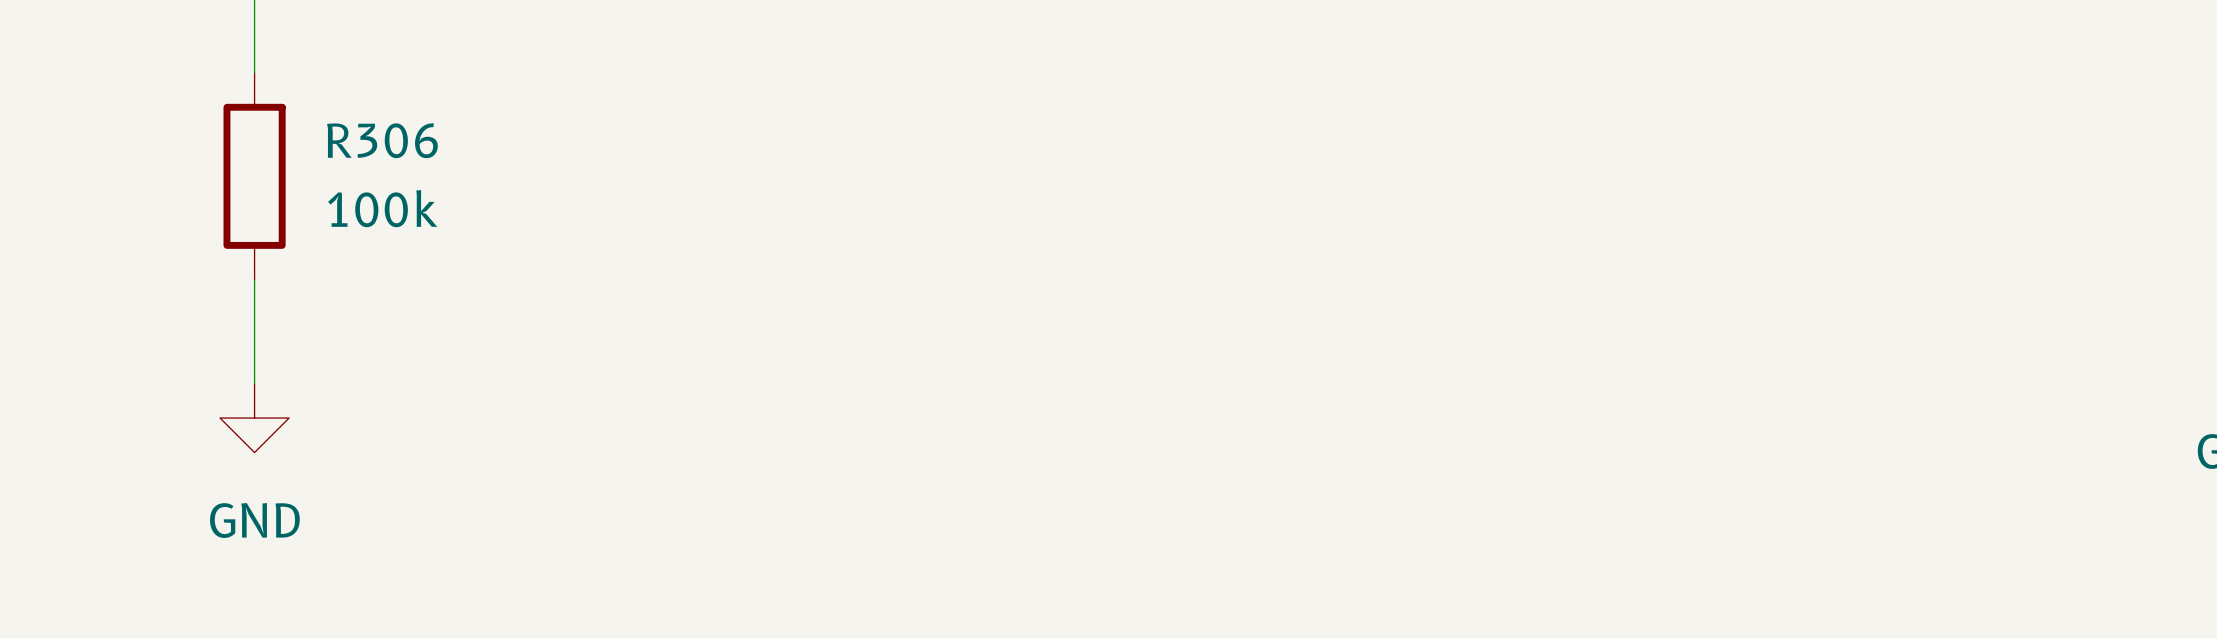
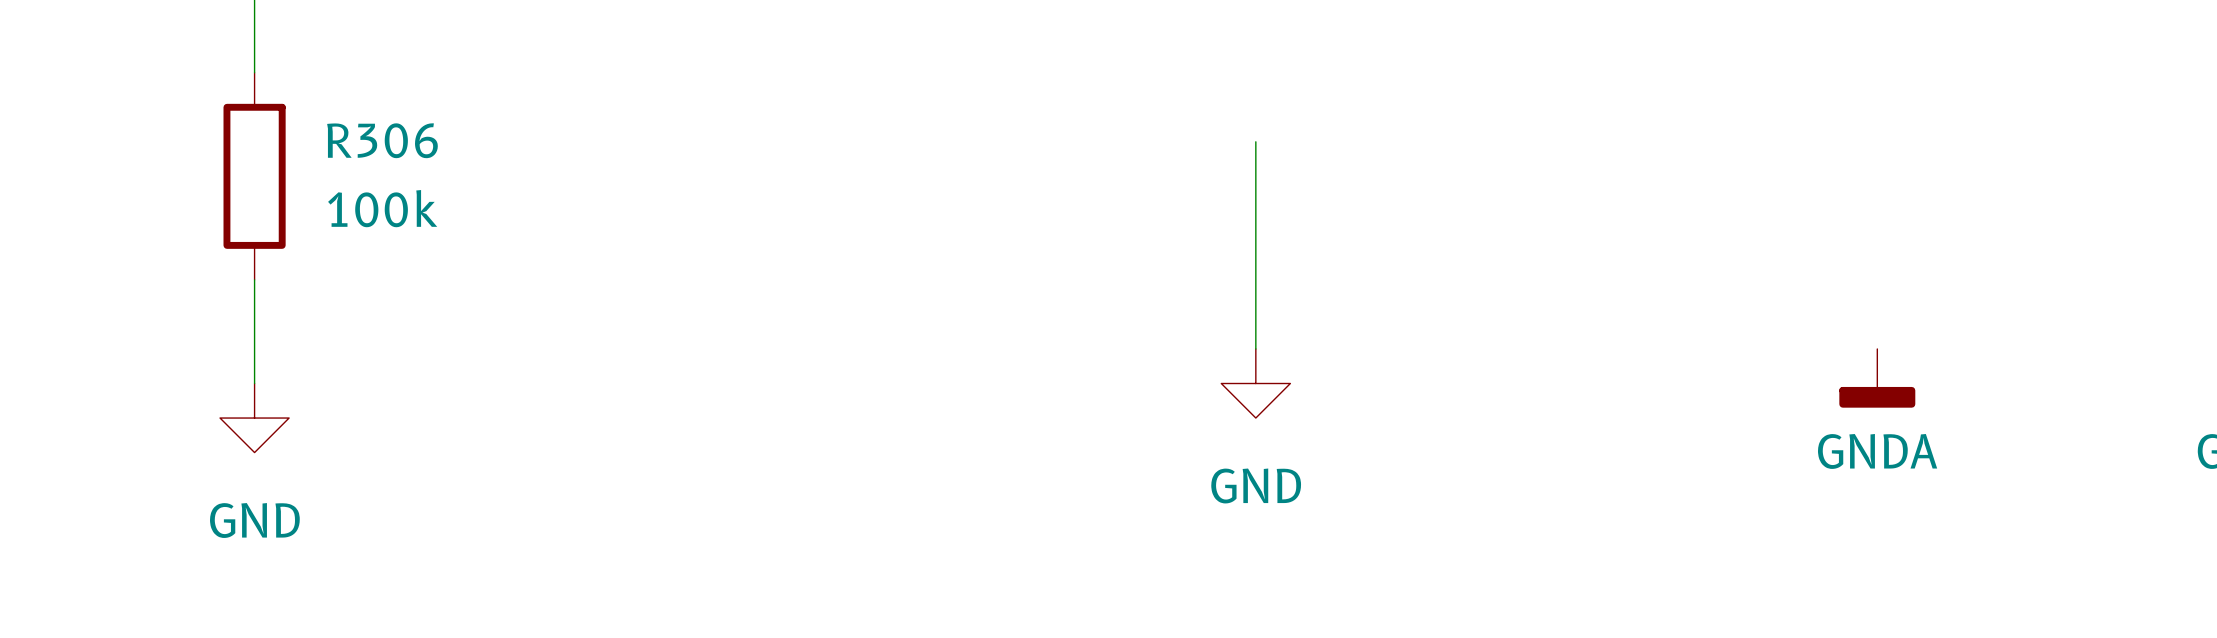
wire: none -> (1255, 141) (1255, 348)
power symbol: none -> GNDA (1877, 378)
power symbol: none -> GND (1255, 383)

